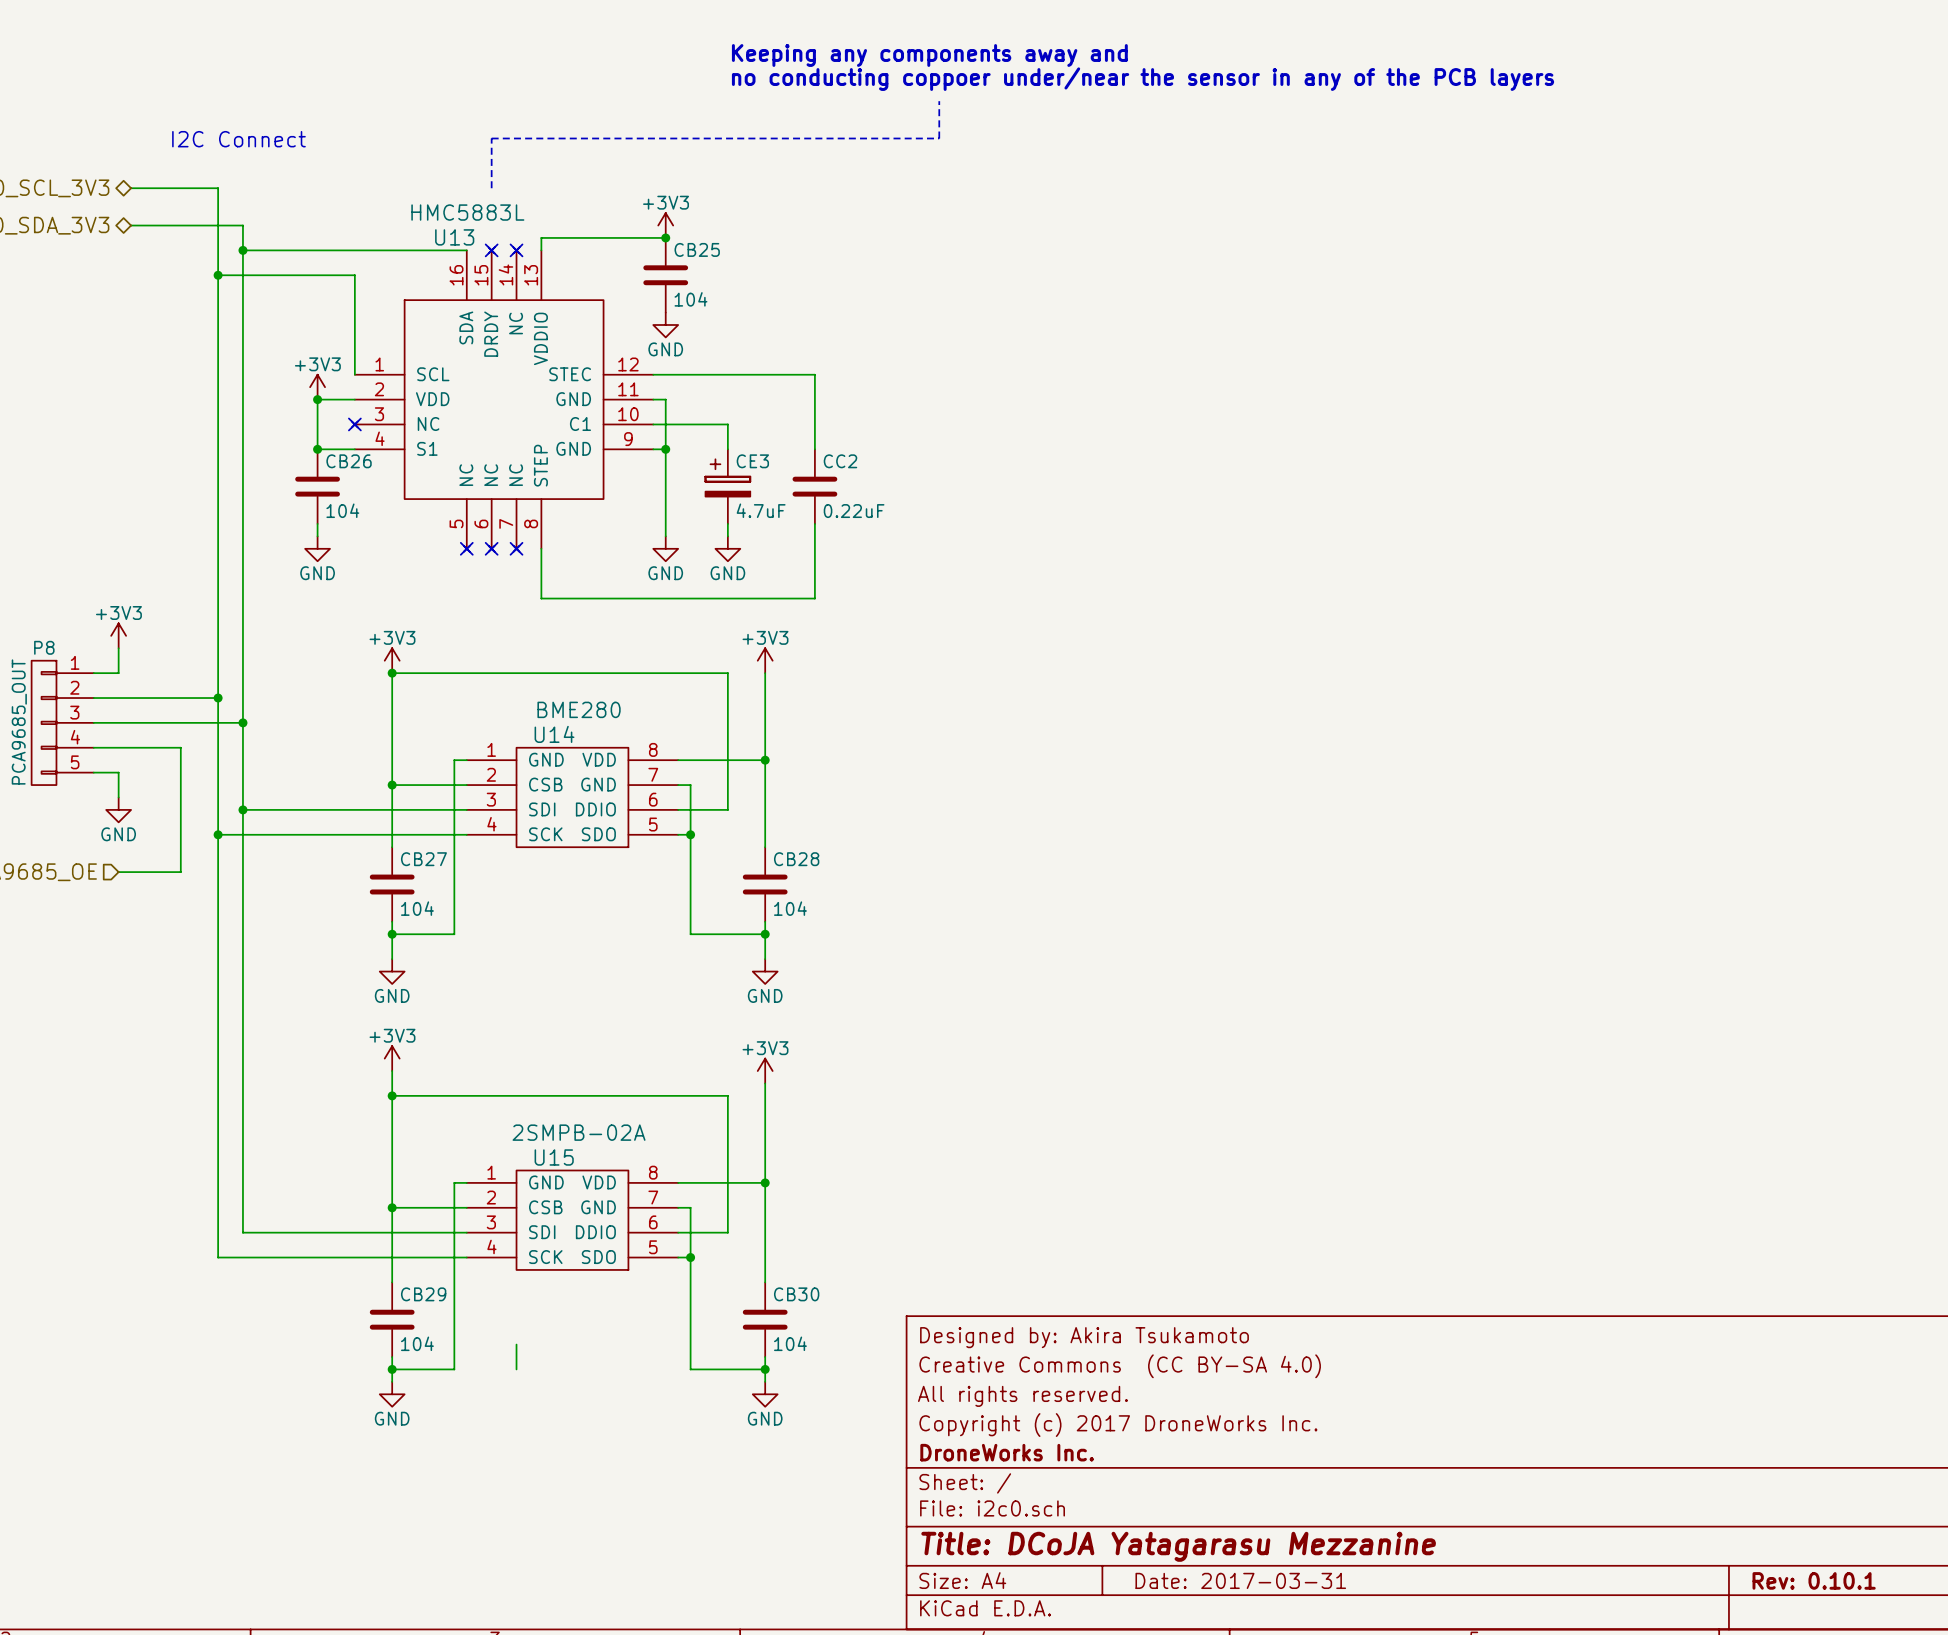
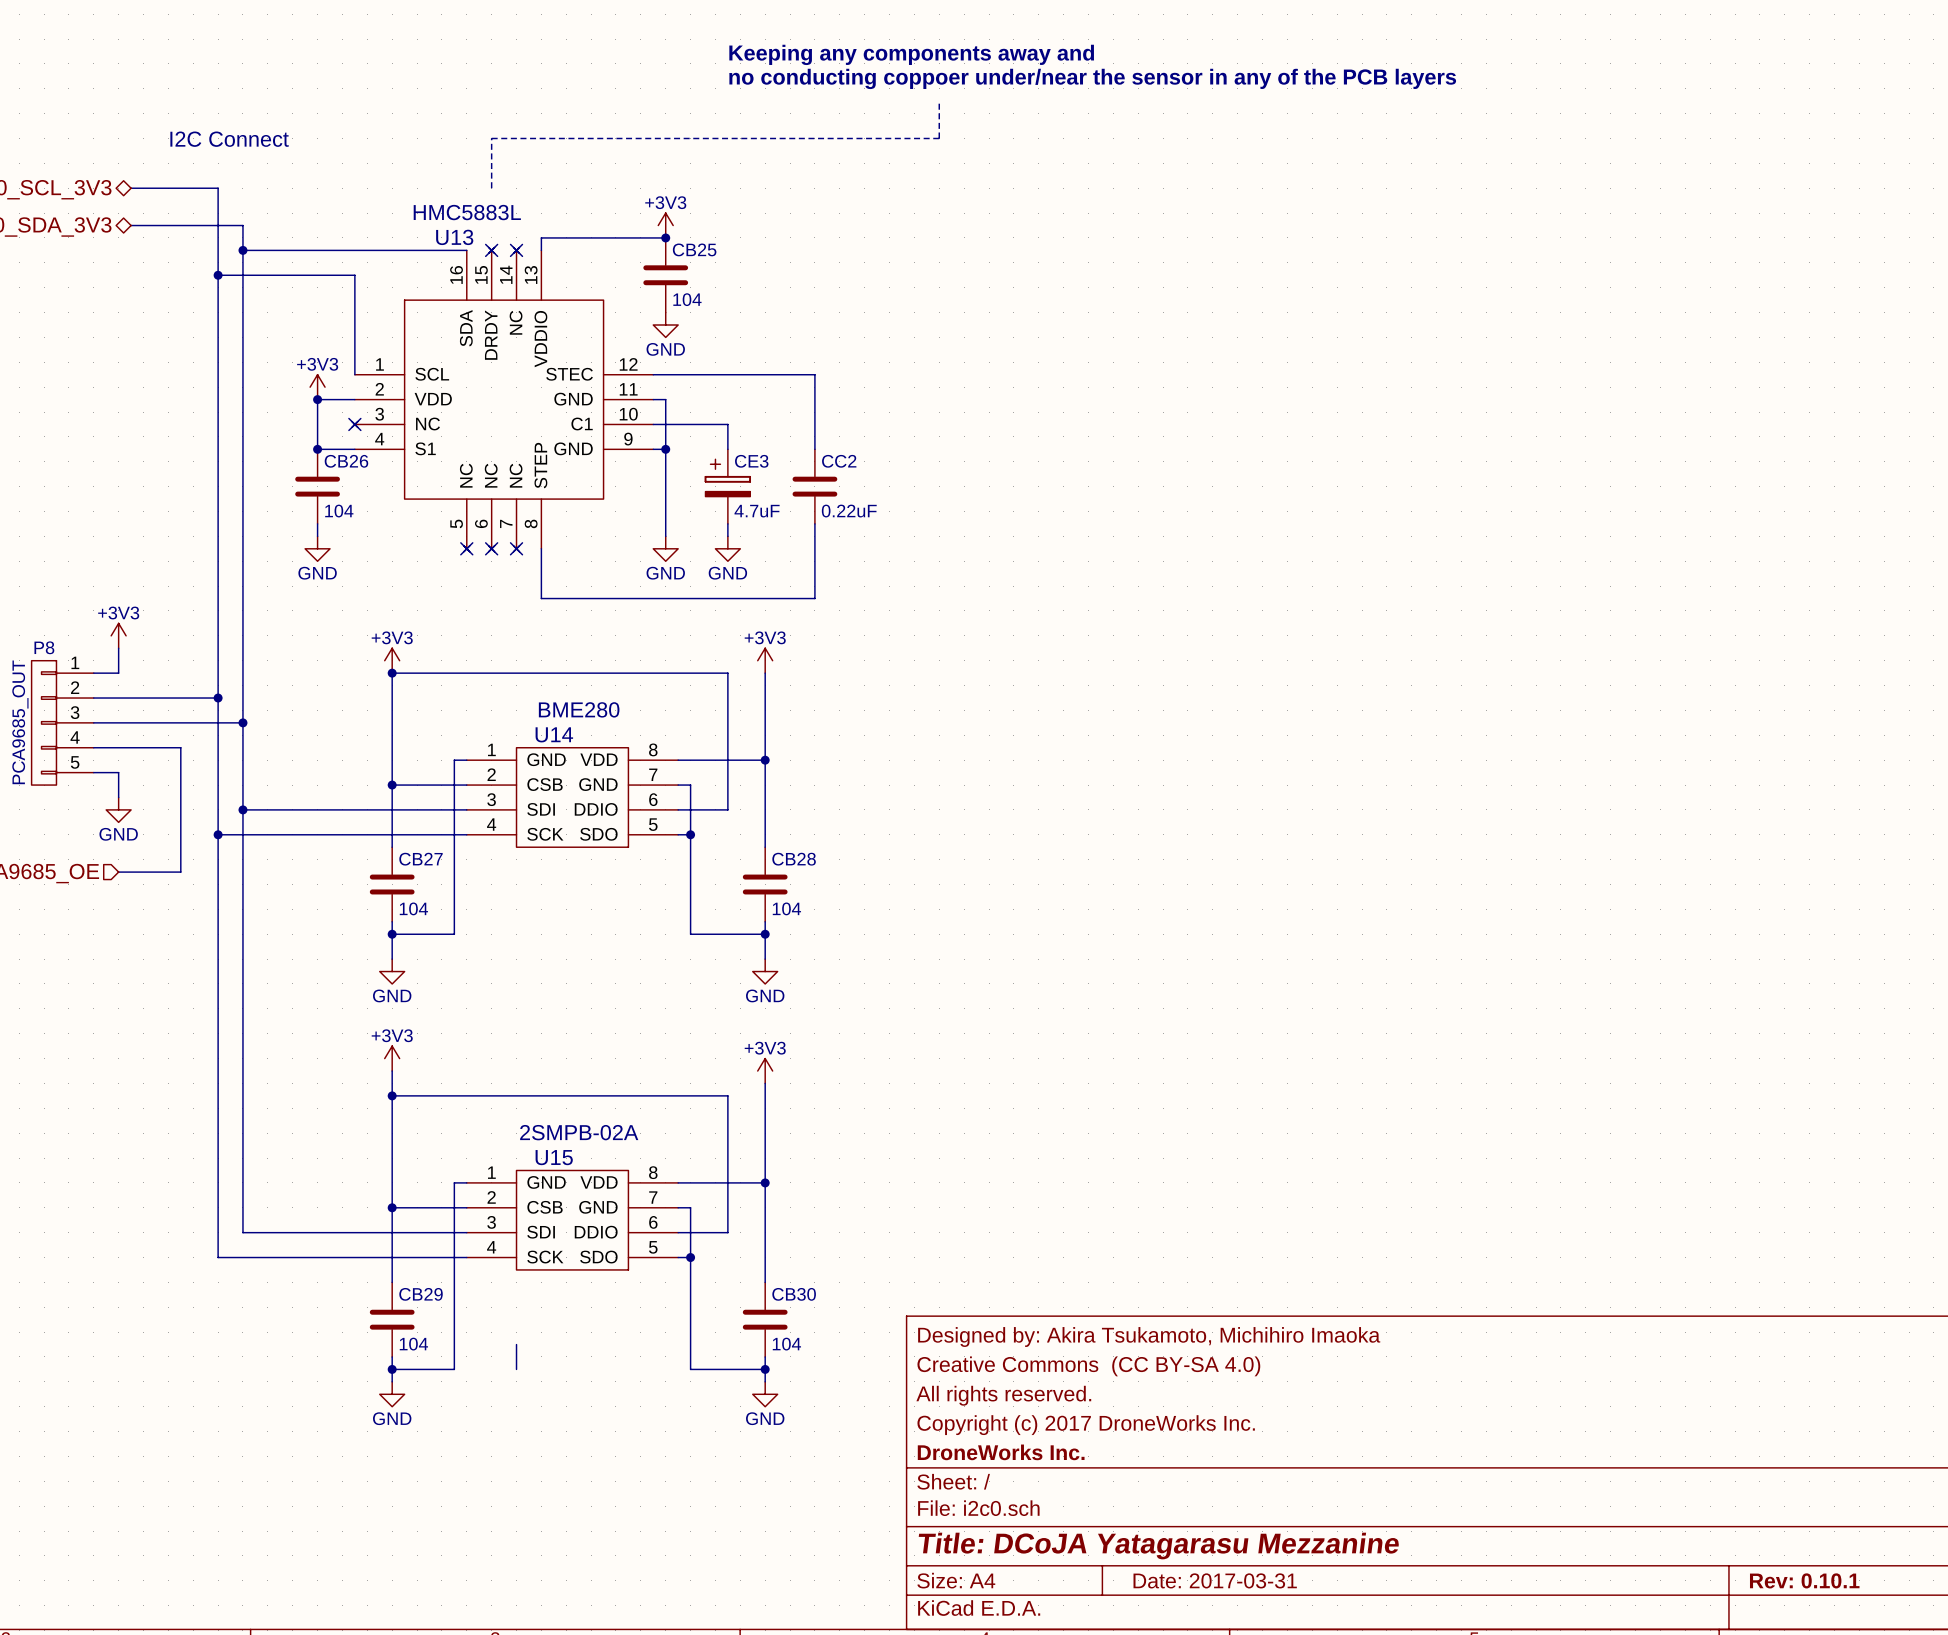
title block: Designed by: Akira Tsukamoto (1084, 1337) -> Designed by: Akira Tsukamoto, Michihiro Imaoka (1149, 1337)

